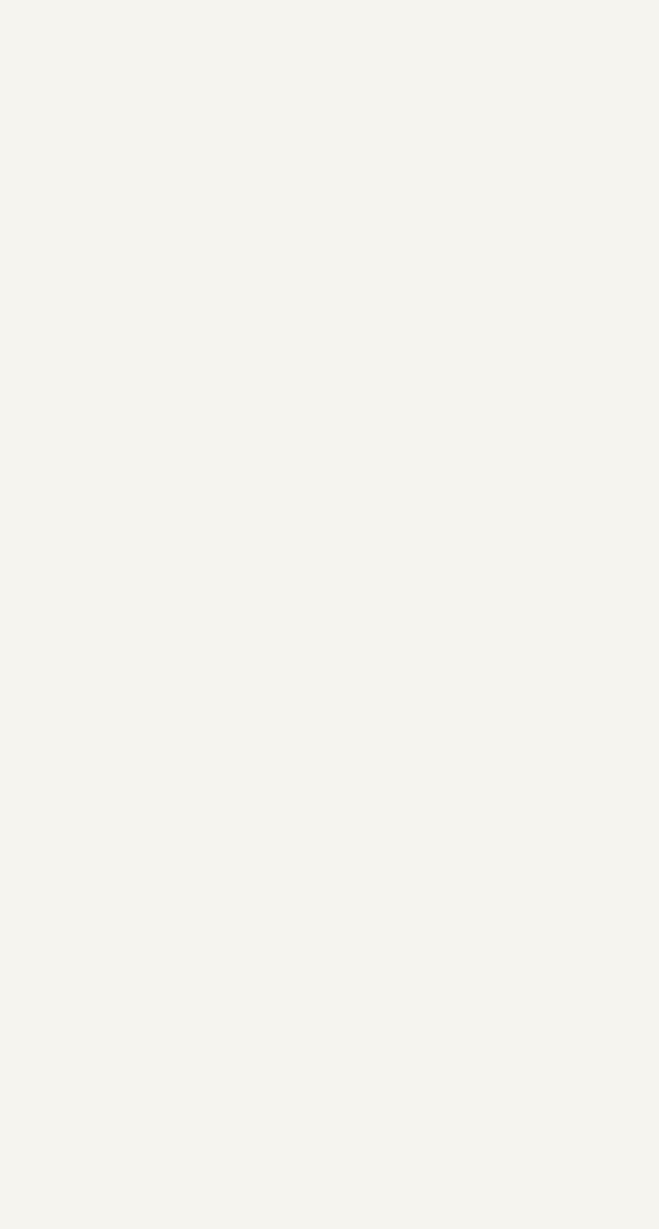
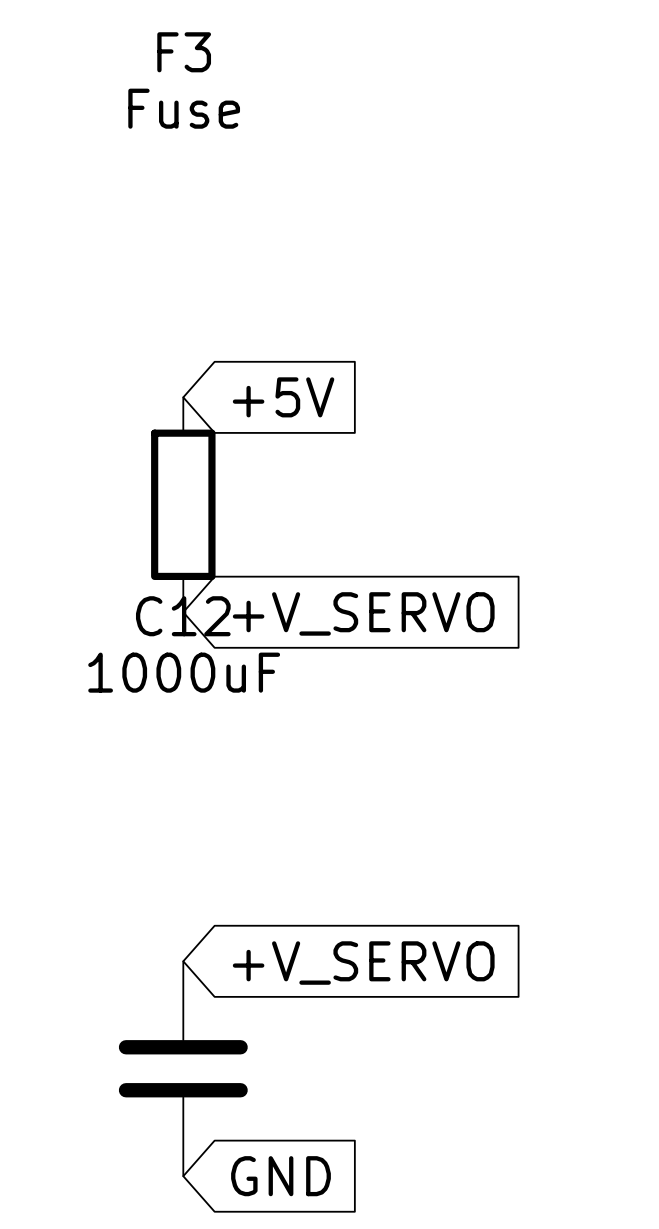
global label: none -> +5V (283, 397)
F3: none -> Fuse (183, 504)
global label: none -> +V_SERVO (363, 613)
global label: none -> +V_SERVO (363, 963)
C12: none -> 1000uF (183, 1068)
global label: none -> GND (280, 1176)

